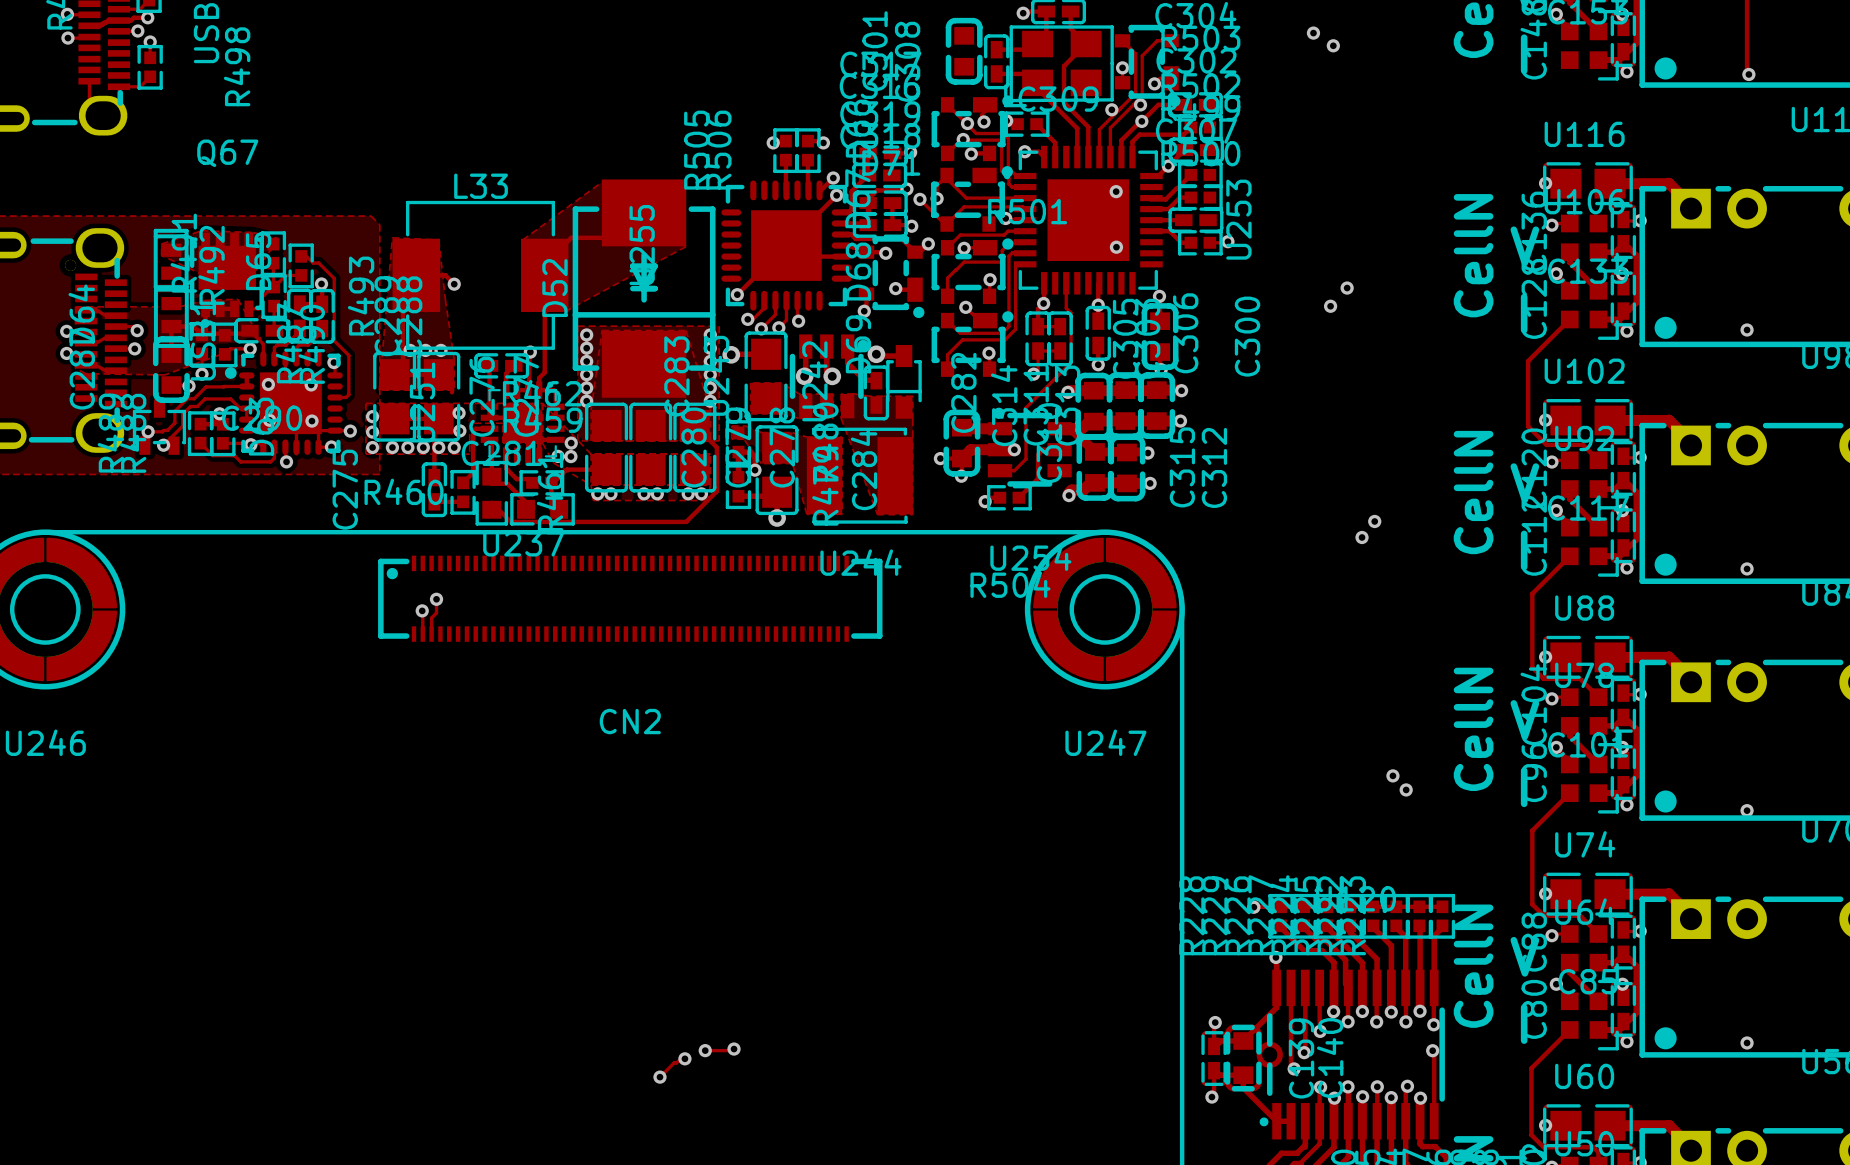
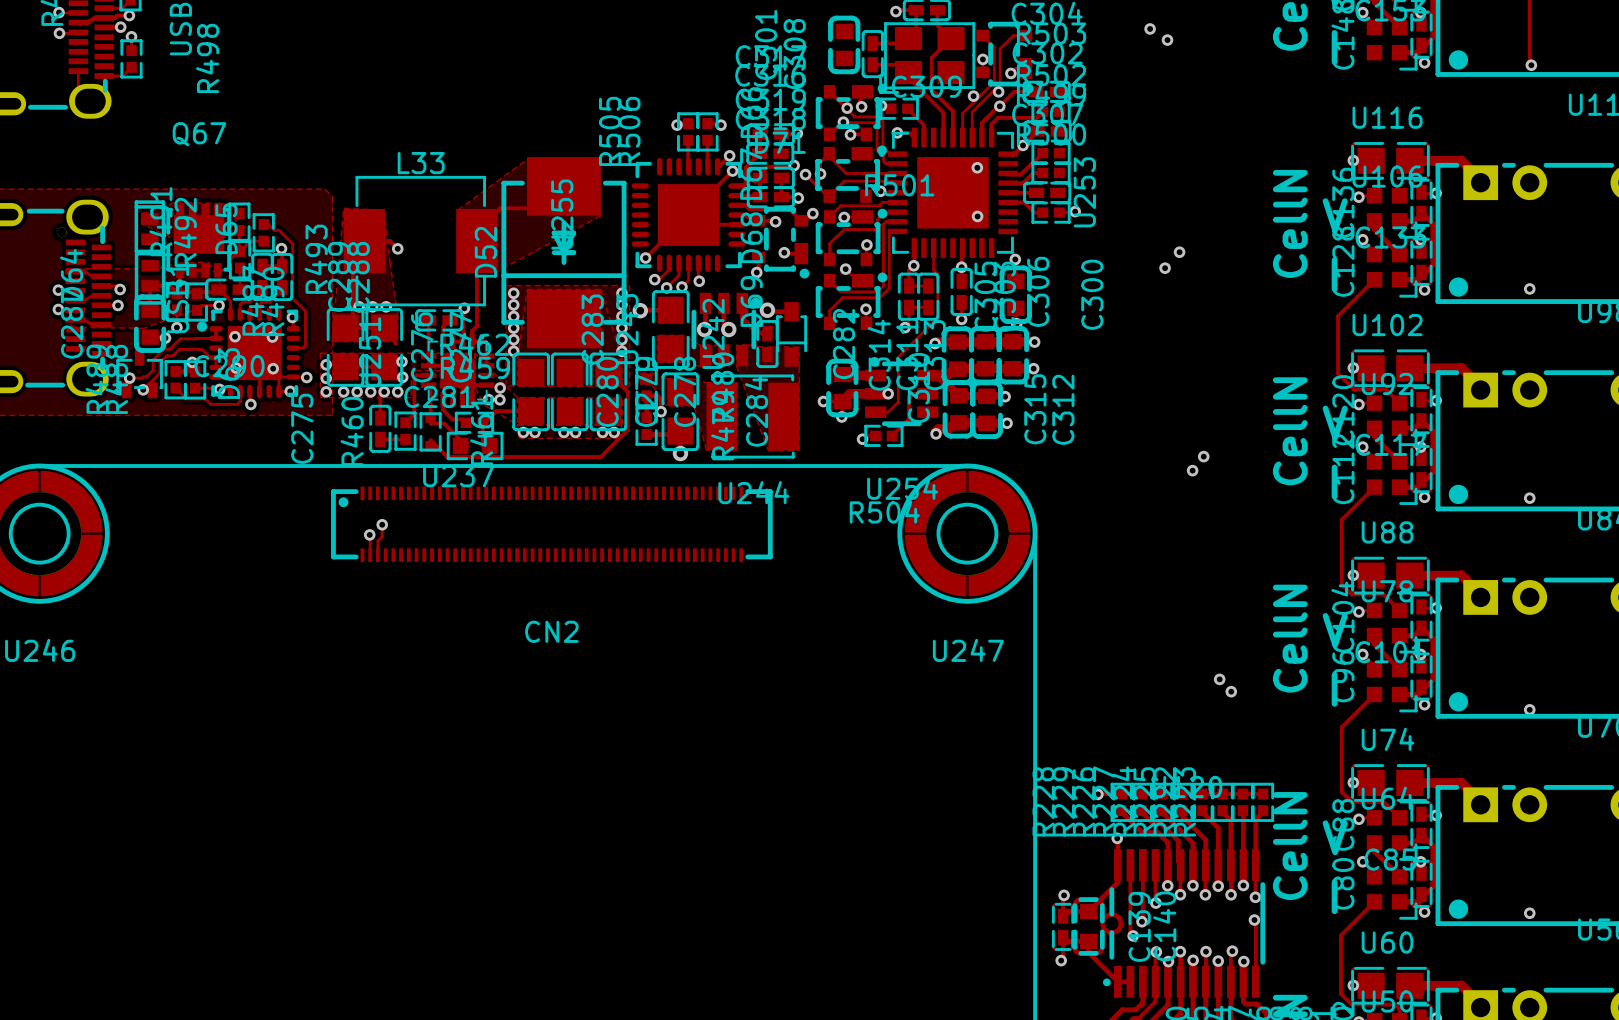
R460 footprint: [475, 460, 508, 526] -> [419, 411, 442, 452]
R460 name rotation: 0° (403, 491) -> 90° counterclockwise (352, 431)
track: (734, 1049) (705, 1050) -> none
via: (734, 1049) -> none
via: (705, 1050) -> none
track: (684, 1058) (680, 1058) (674, 1062) (659, 1077) -> none
via: (684, 1058) -> none
via: (659, 1077) -> none

